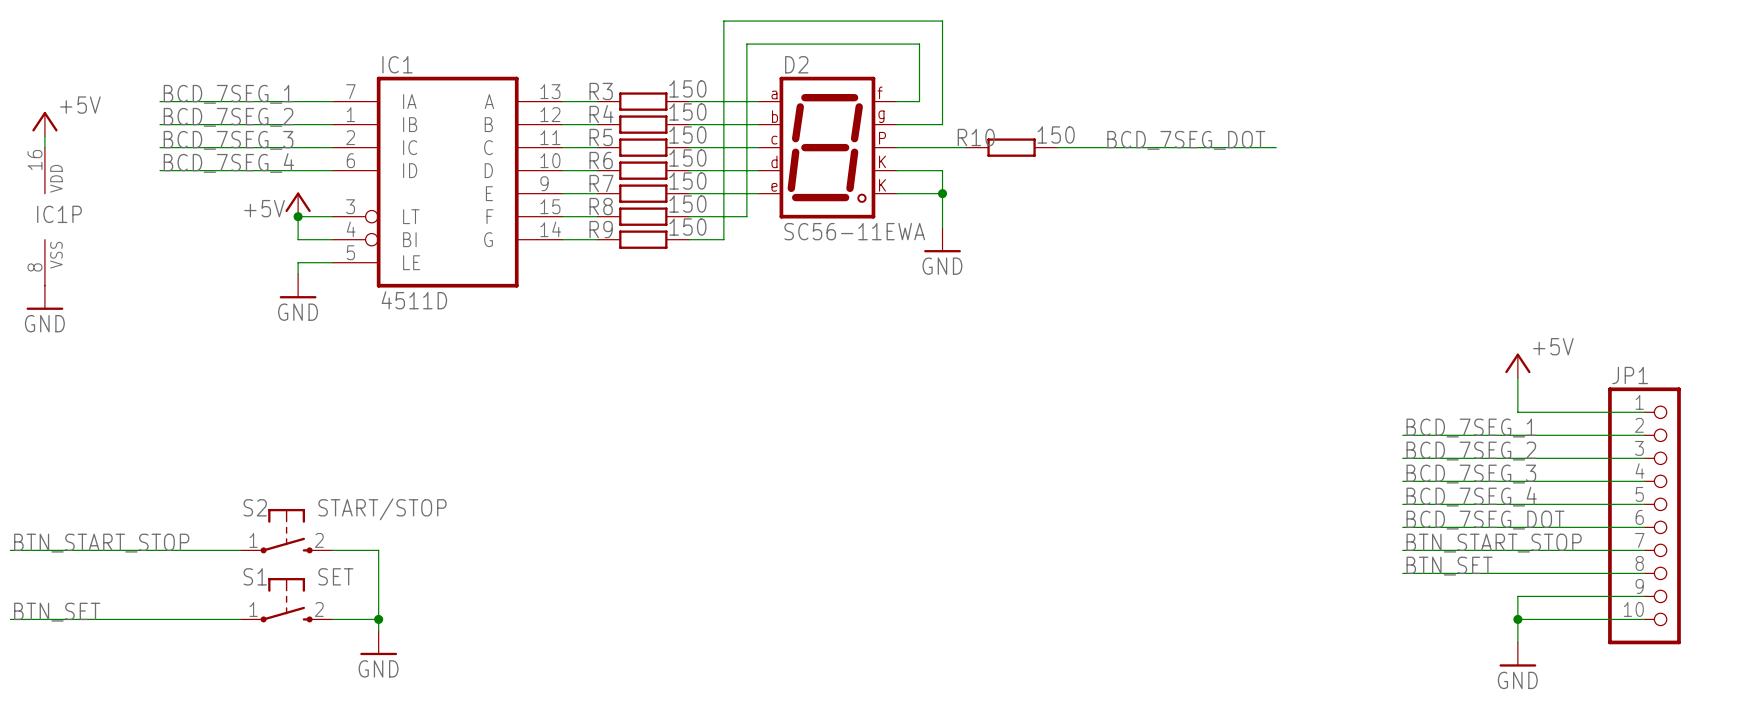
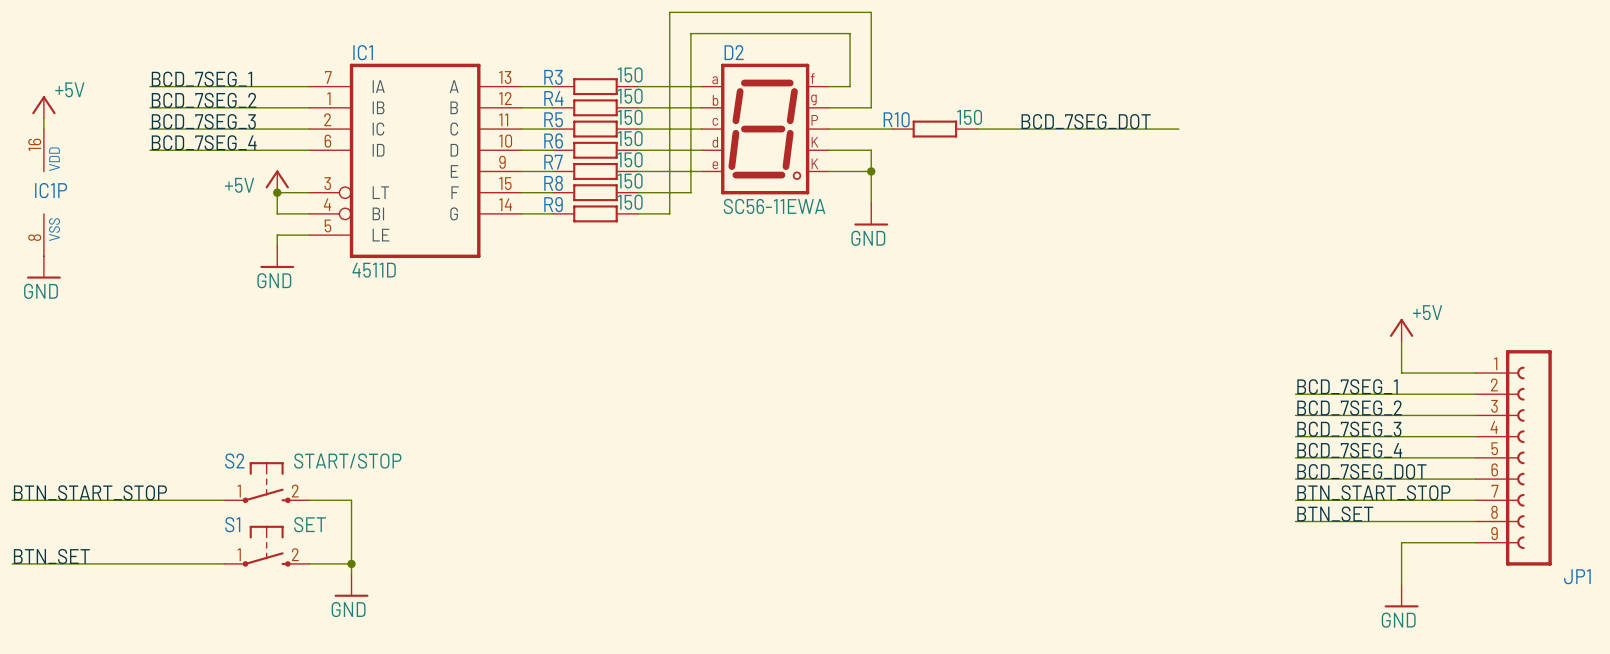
JP1 name position: JP1 (1630, 375) -> JP1 (1577, 576)
JP1 symbol: [1608, 387, 1681, 645] -> [1475, 350, 1552, 566]
wire: (1517, 619) (1644, 619) -> none
junction: (1517, 619) -> none

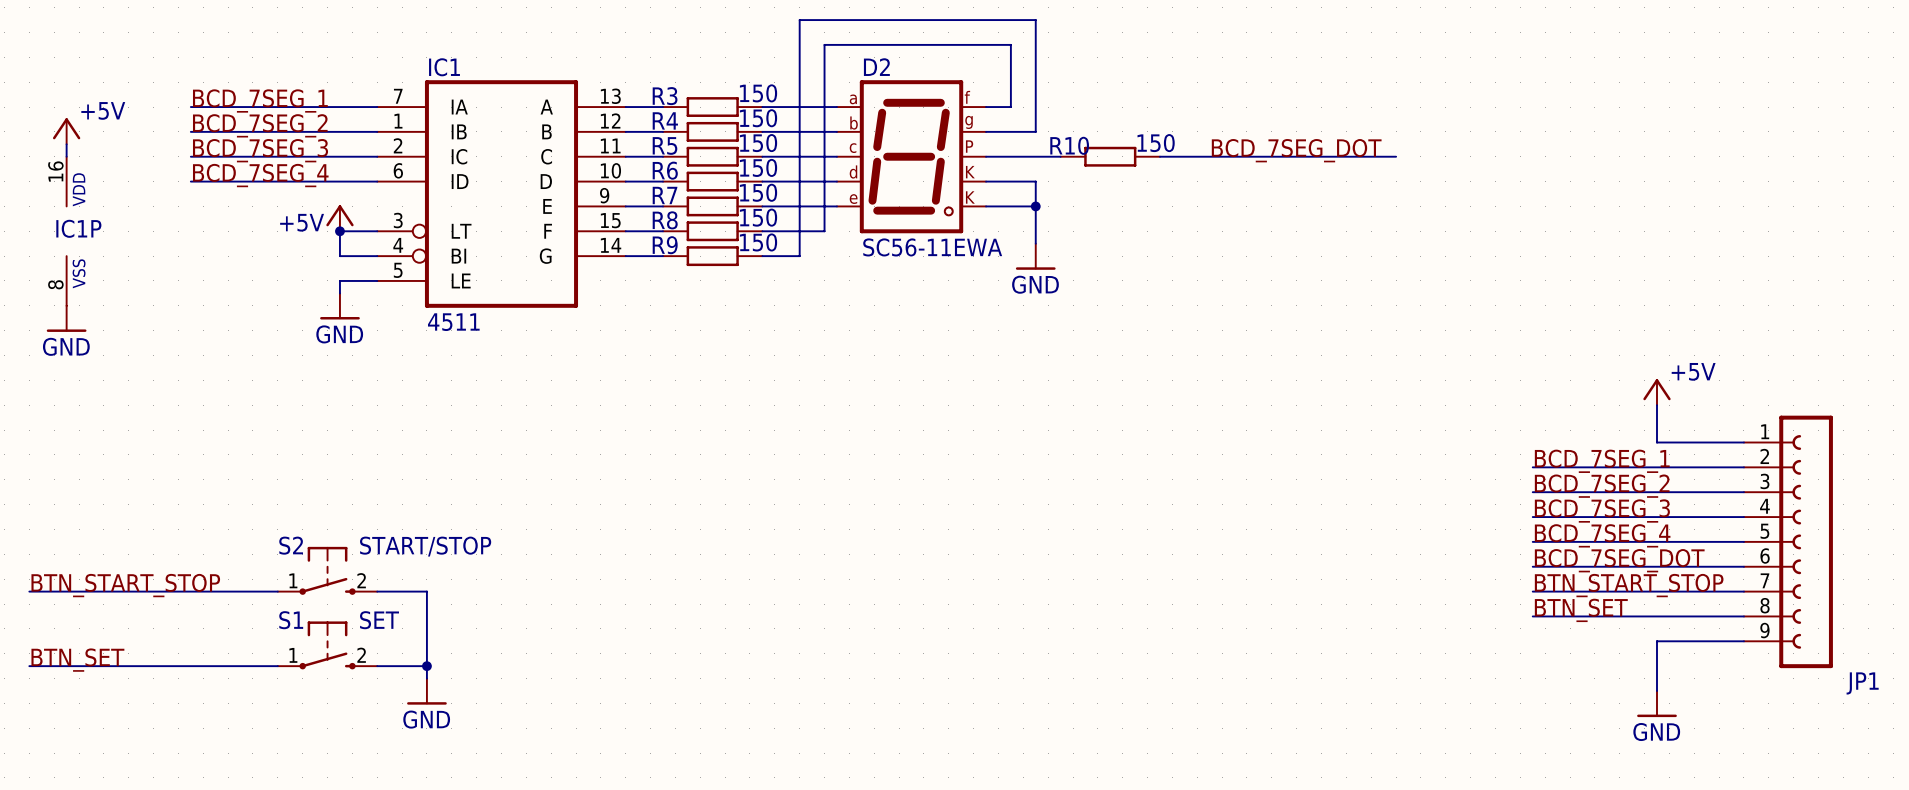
IC1 value: 4511D (374, 270) -> 4511 (453, 322)

